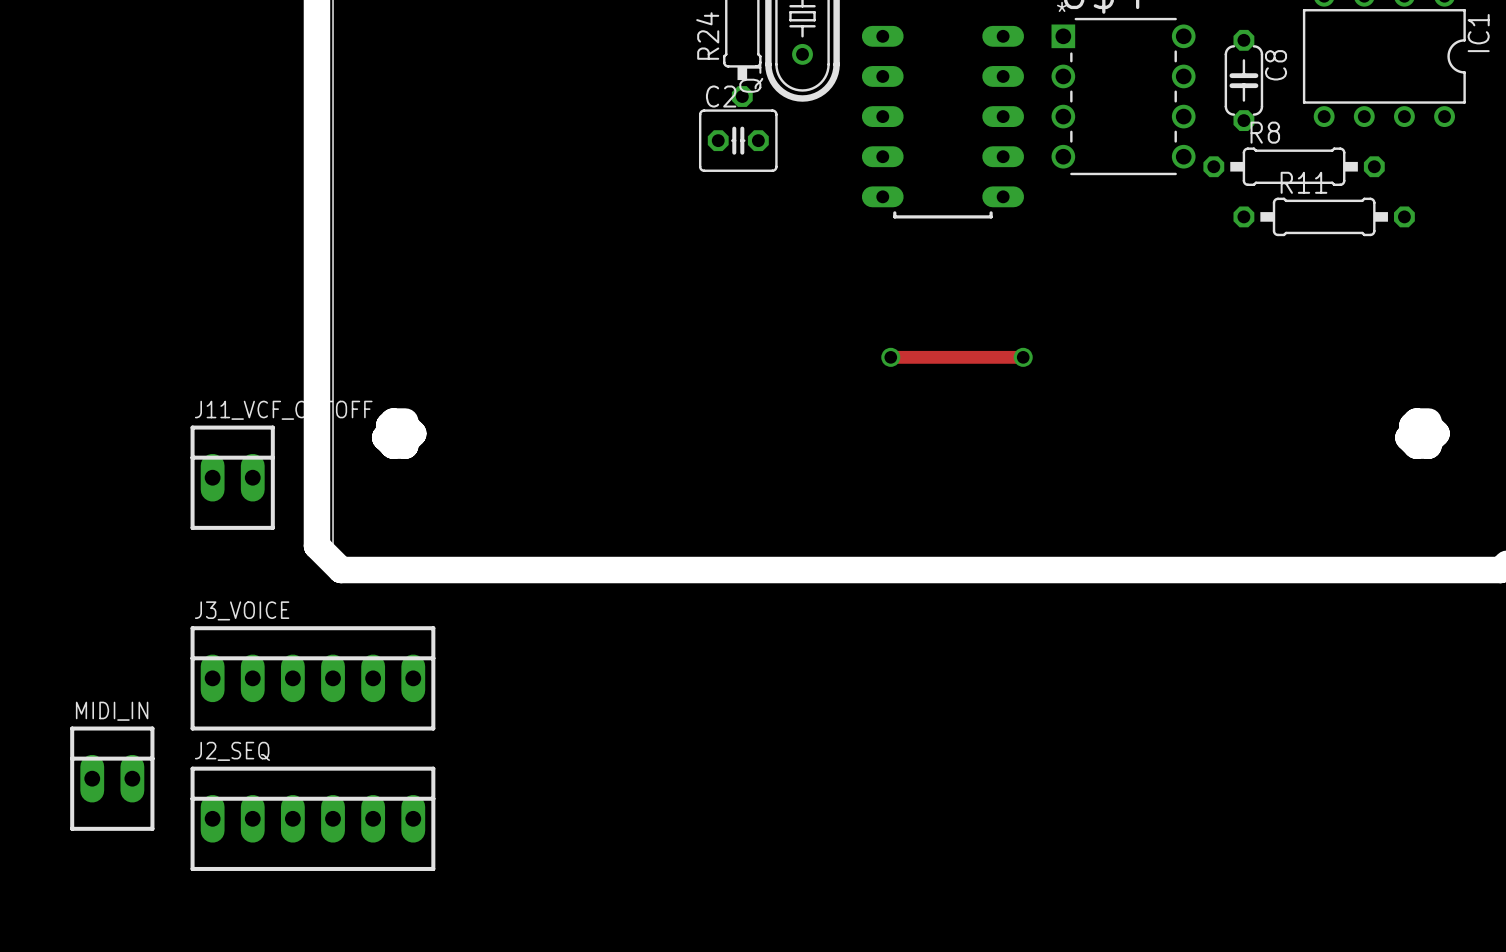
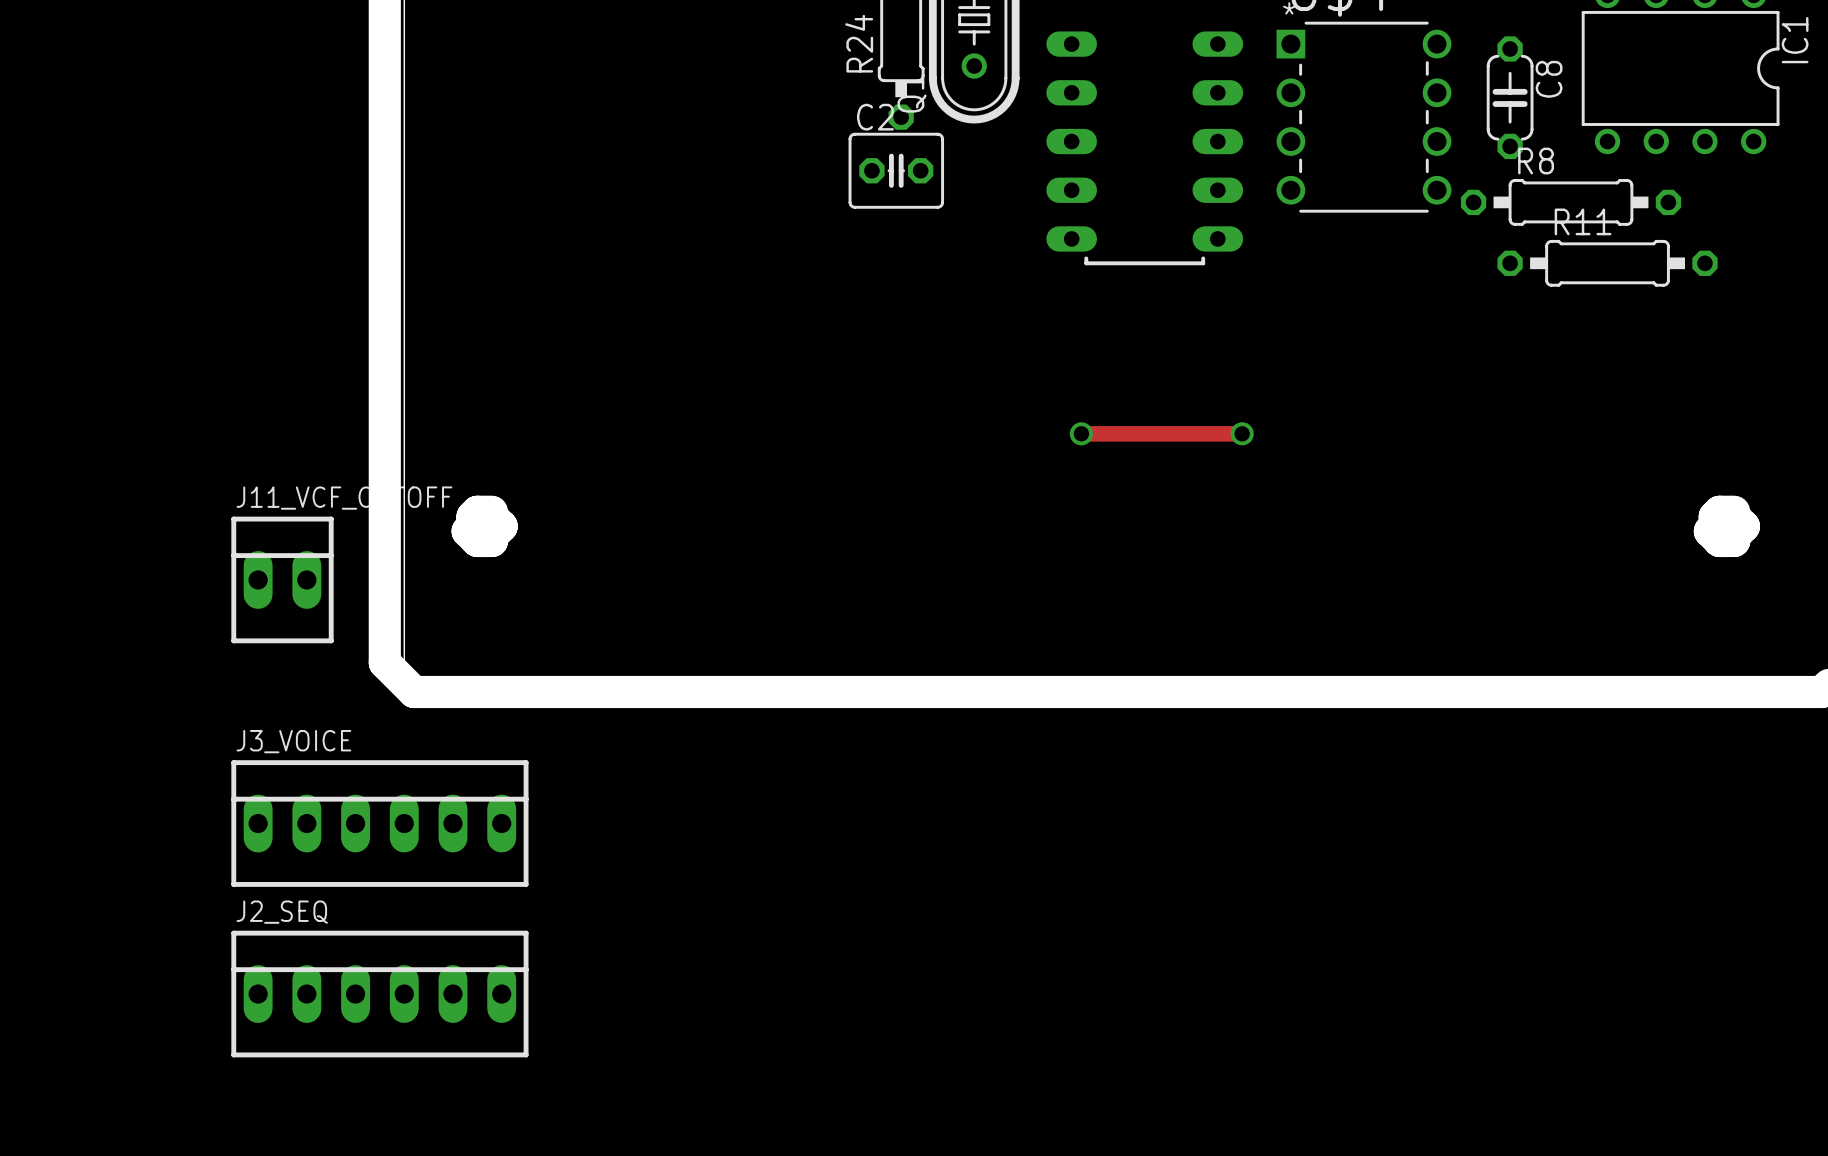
MIDI_IN: (112, 778) -> none

